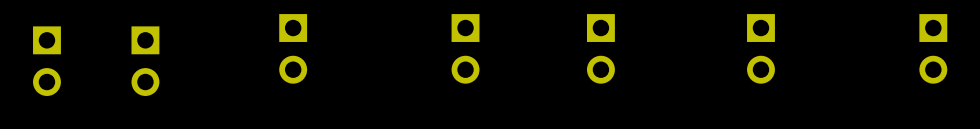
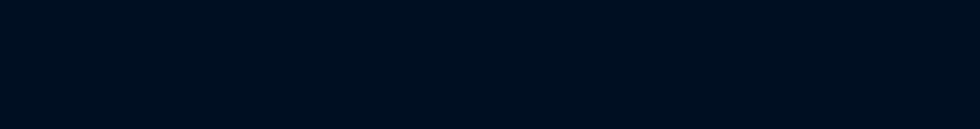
part: (293, 48) -> none
part: (465, 48) -> none
part: (600, 48) -> none
part: (760, 48) -> none
part: (933, 48) -> none
part: (46, 61) -> none
part: (145, 61) -> none

